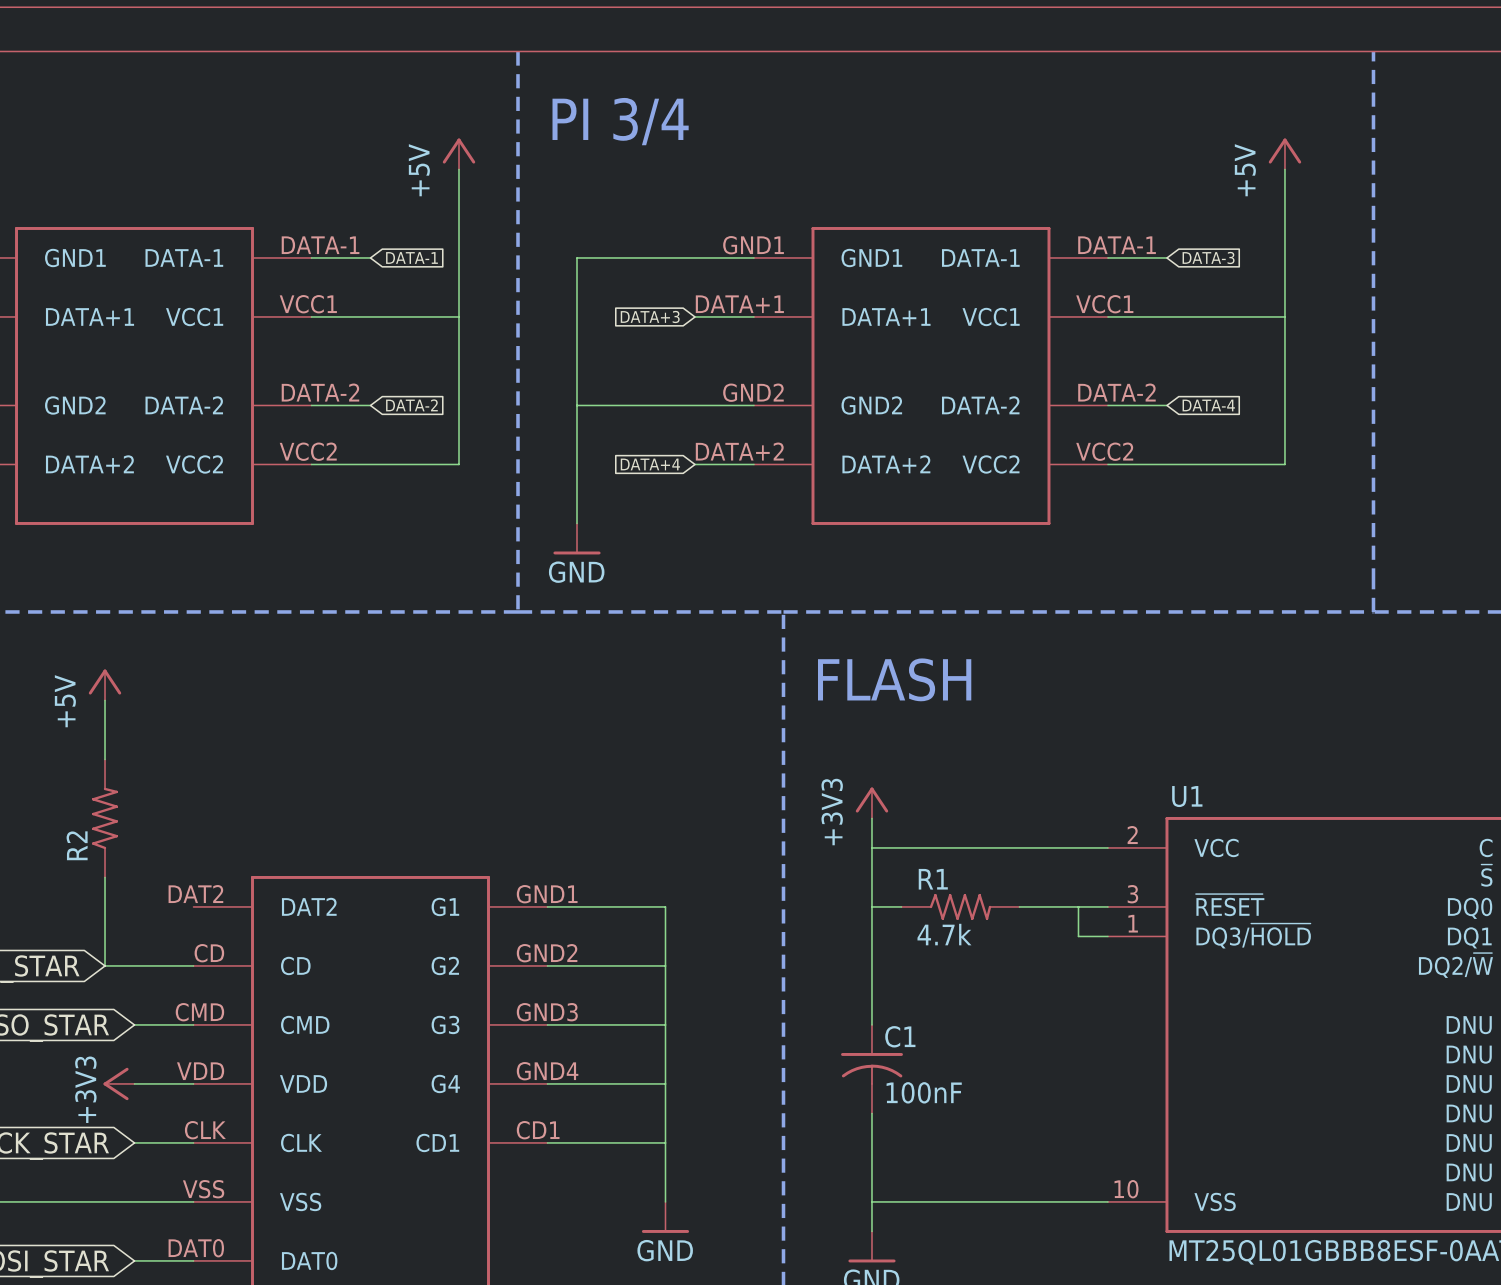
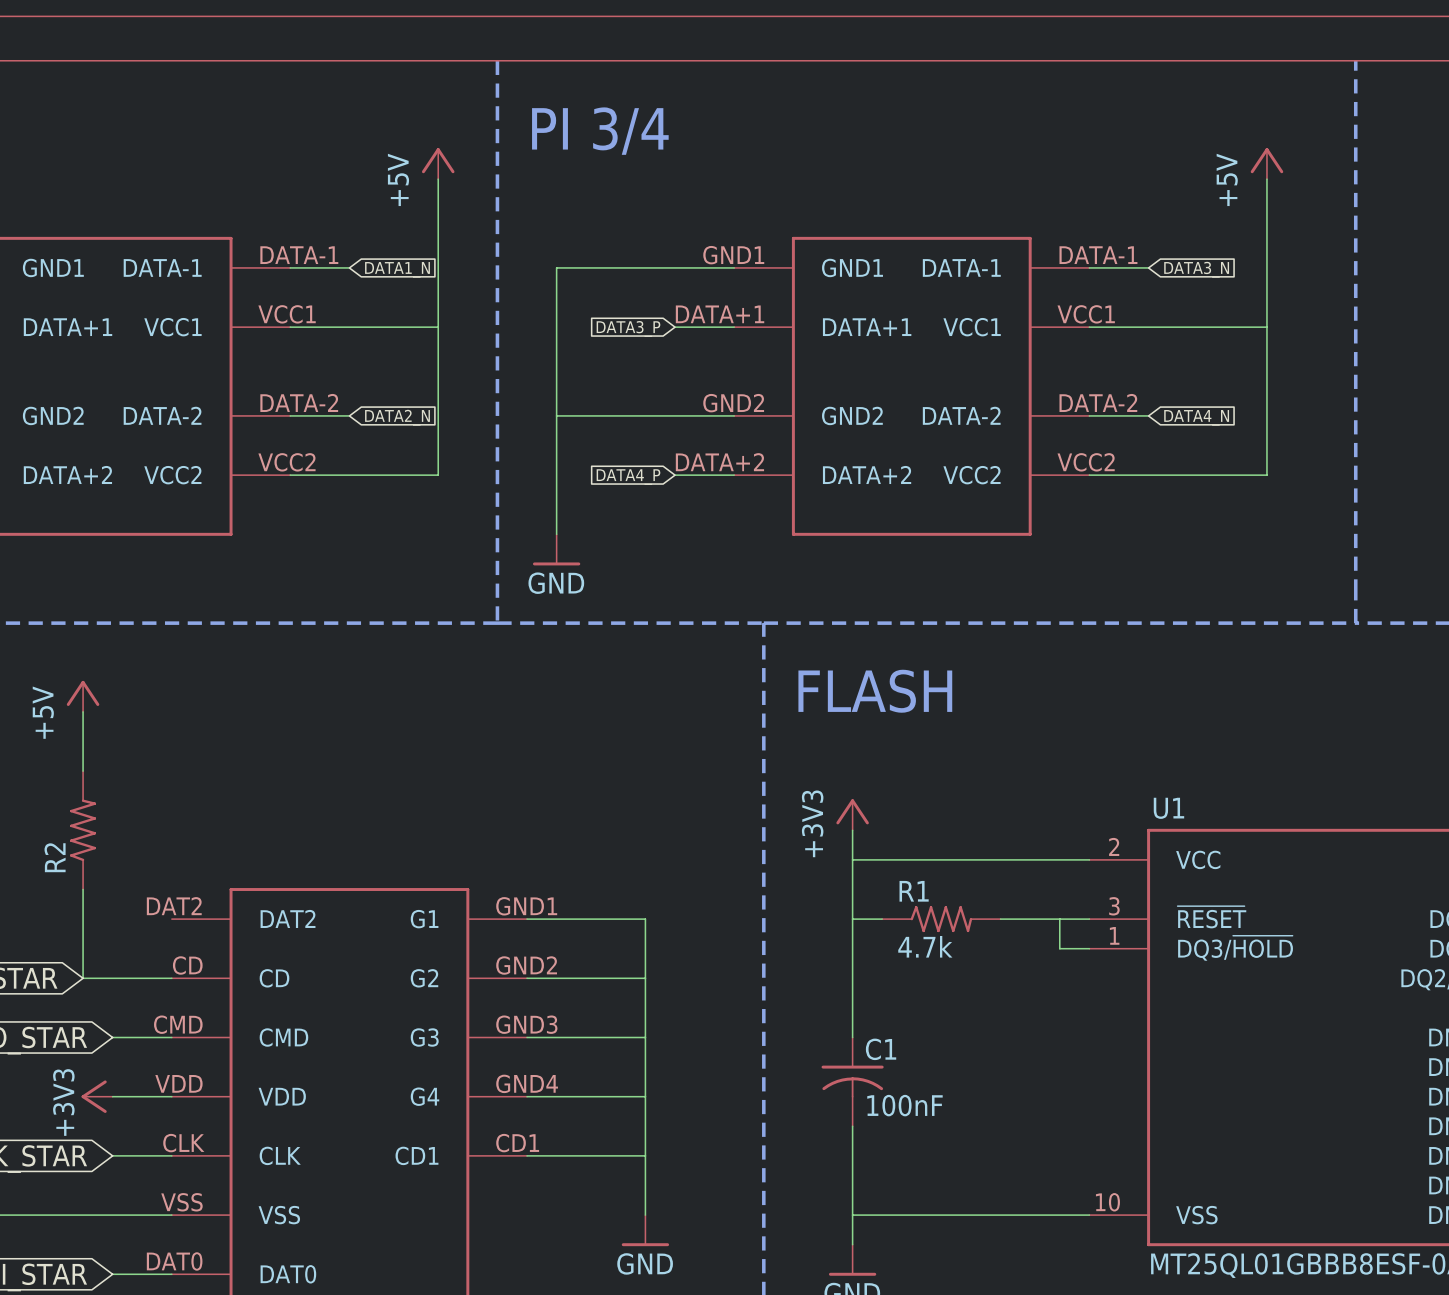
global label: DATA-1 (411, 257) -> DATA1_N (397, 269)
global label: DATA-3 (1208, 257) -> DATA3_N (1196, 269)
global label: DATA+3 (650, 316) -> DATA3_P (628, 328)
global label: DATA-2 (411, 405) -> DATA2_N (397, 417)
global label: DATA-4 (1208, 405) -> DATA4_N (1196, 417)
global label: DATA+4 (650, 464) -> DATA4_P (628, 477)

